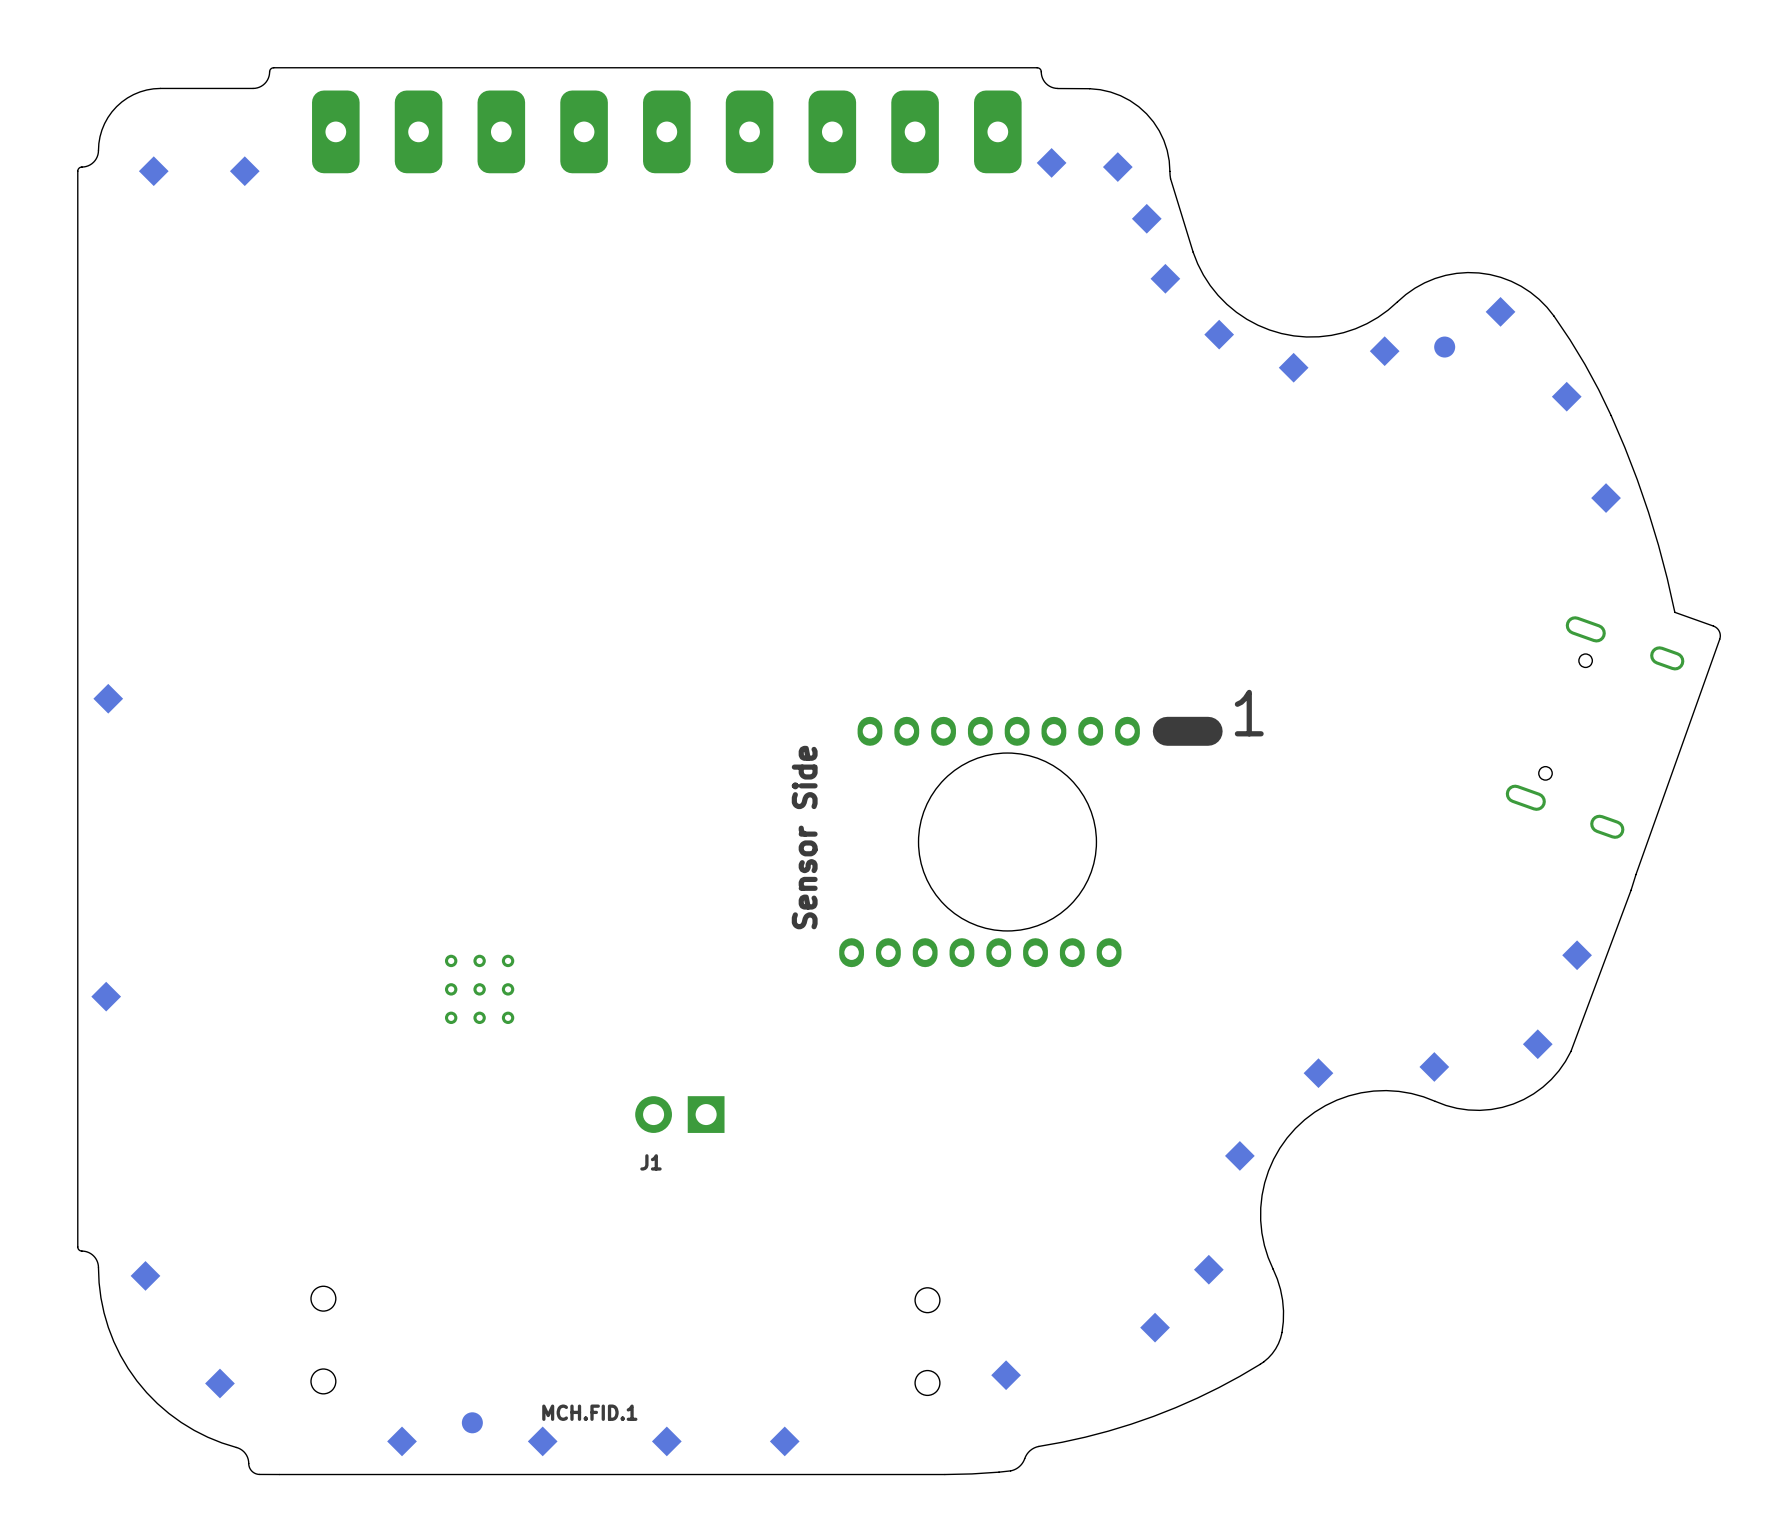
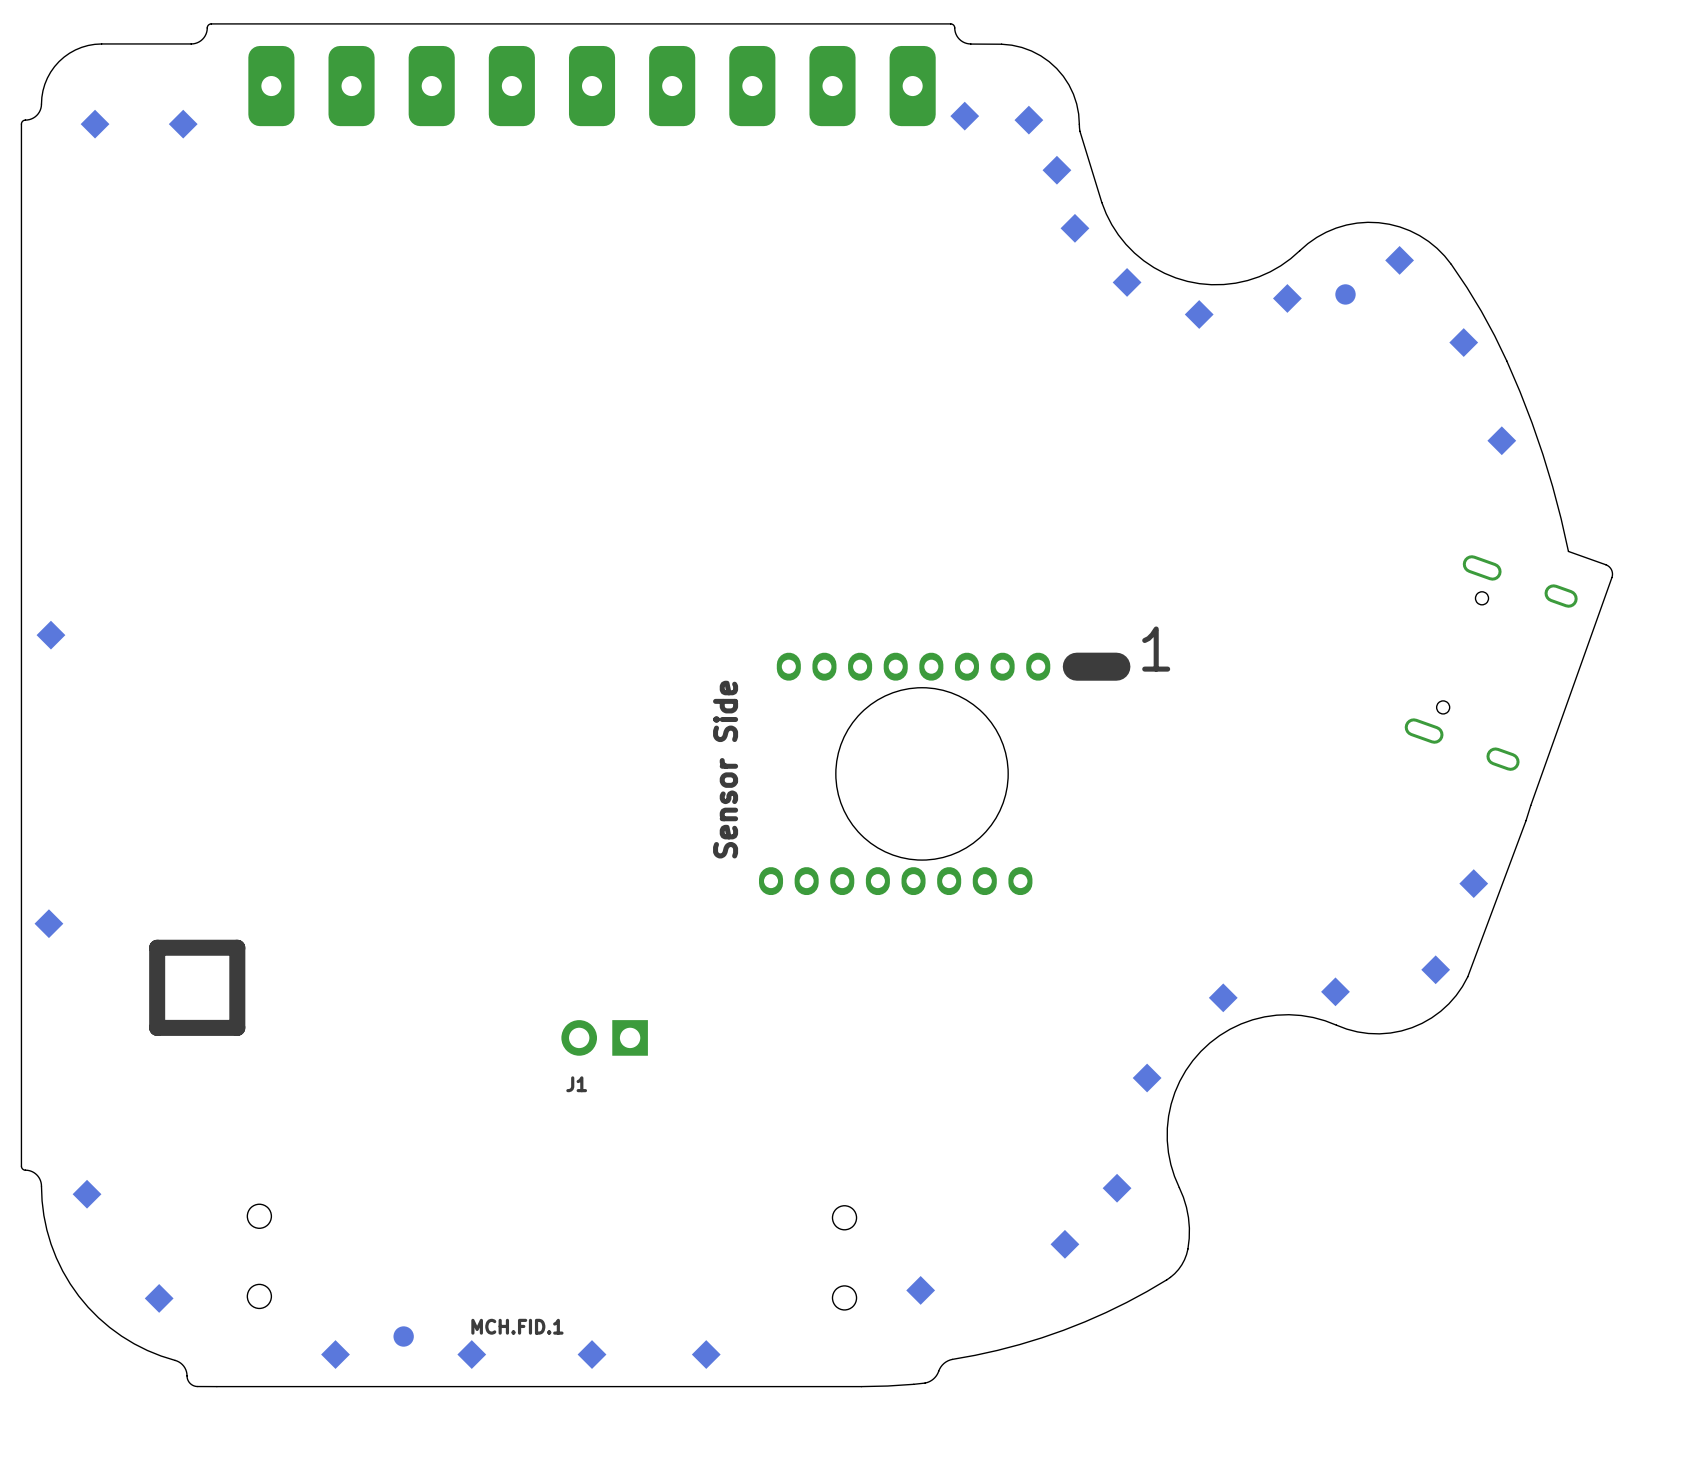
part: (479, 989) -> none
line: none -> (237, 947) (237, 1027) (157, 1027) (157, 947) (237, 947)

